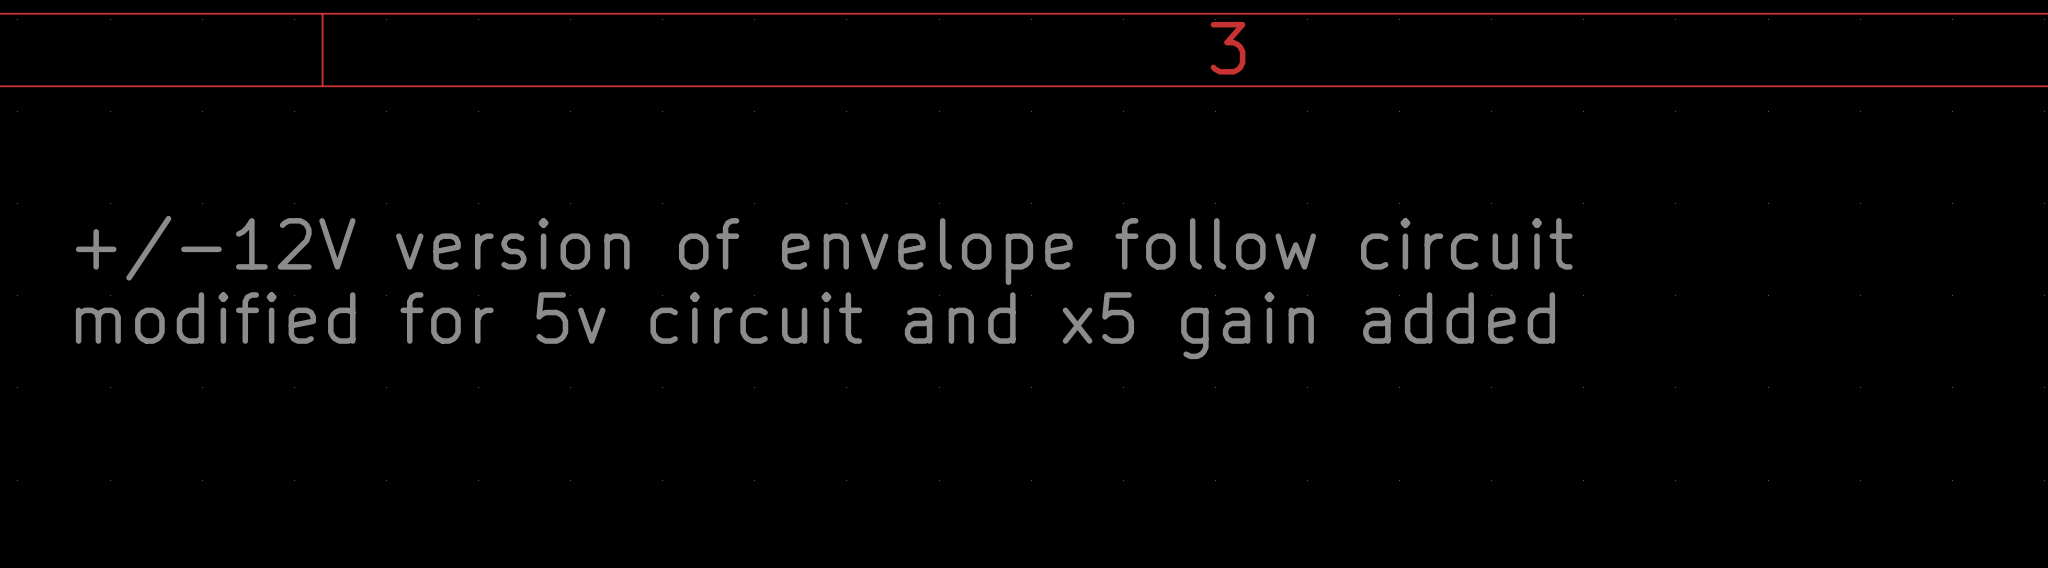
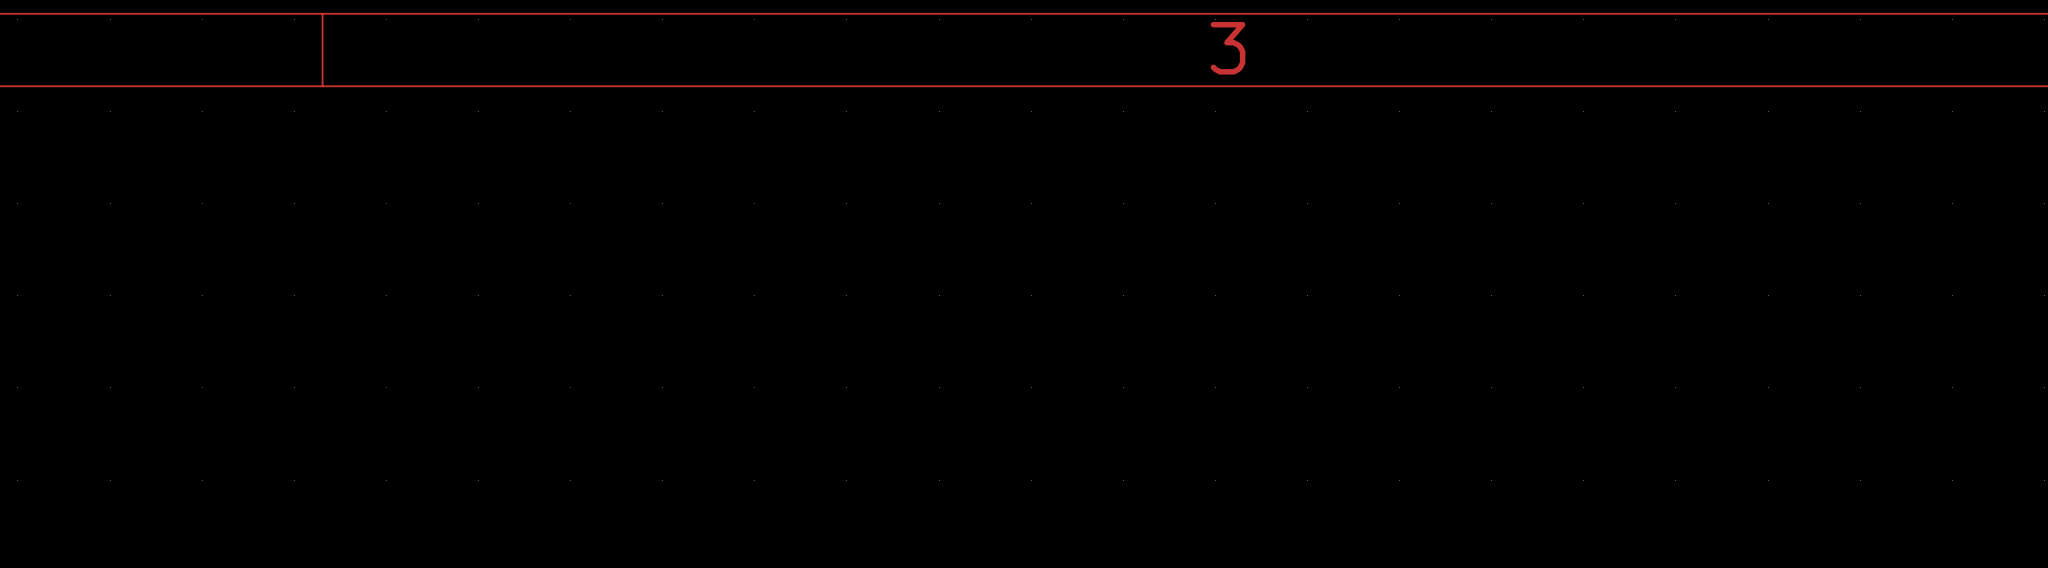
text: +/-12V version of envelope follow circuit (824, 250) -> none
text: modified for 5v circuit and x5 gain added (815, 325) -> none

